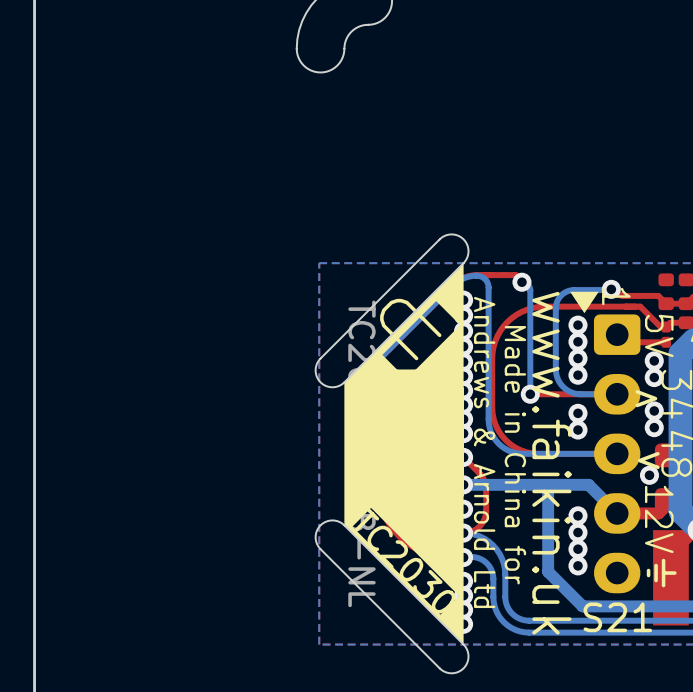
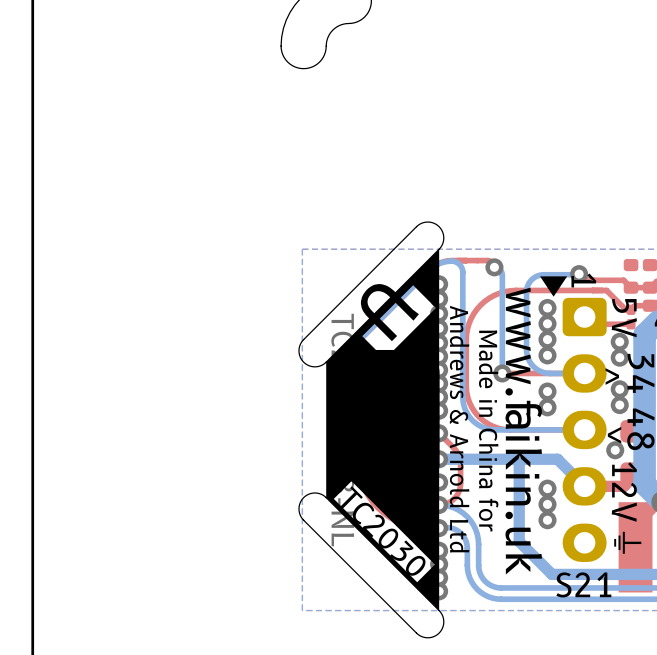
via: (577, 565) -> none

